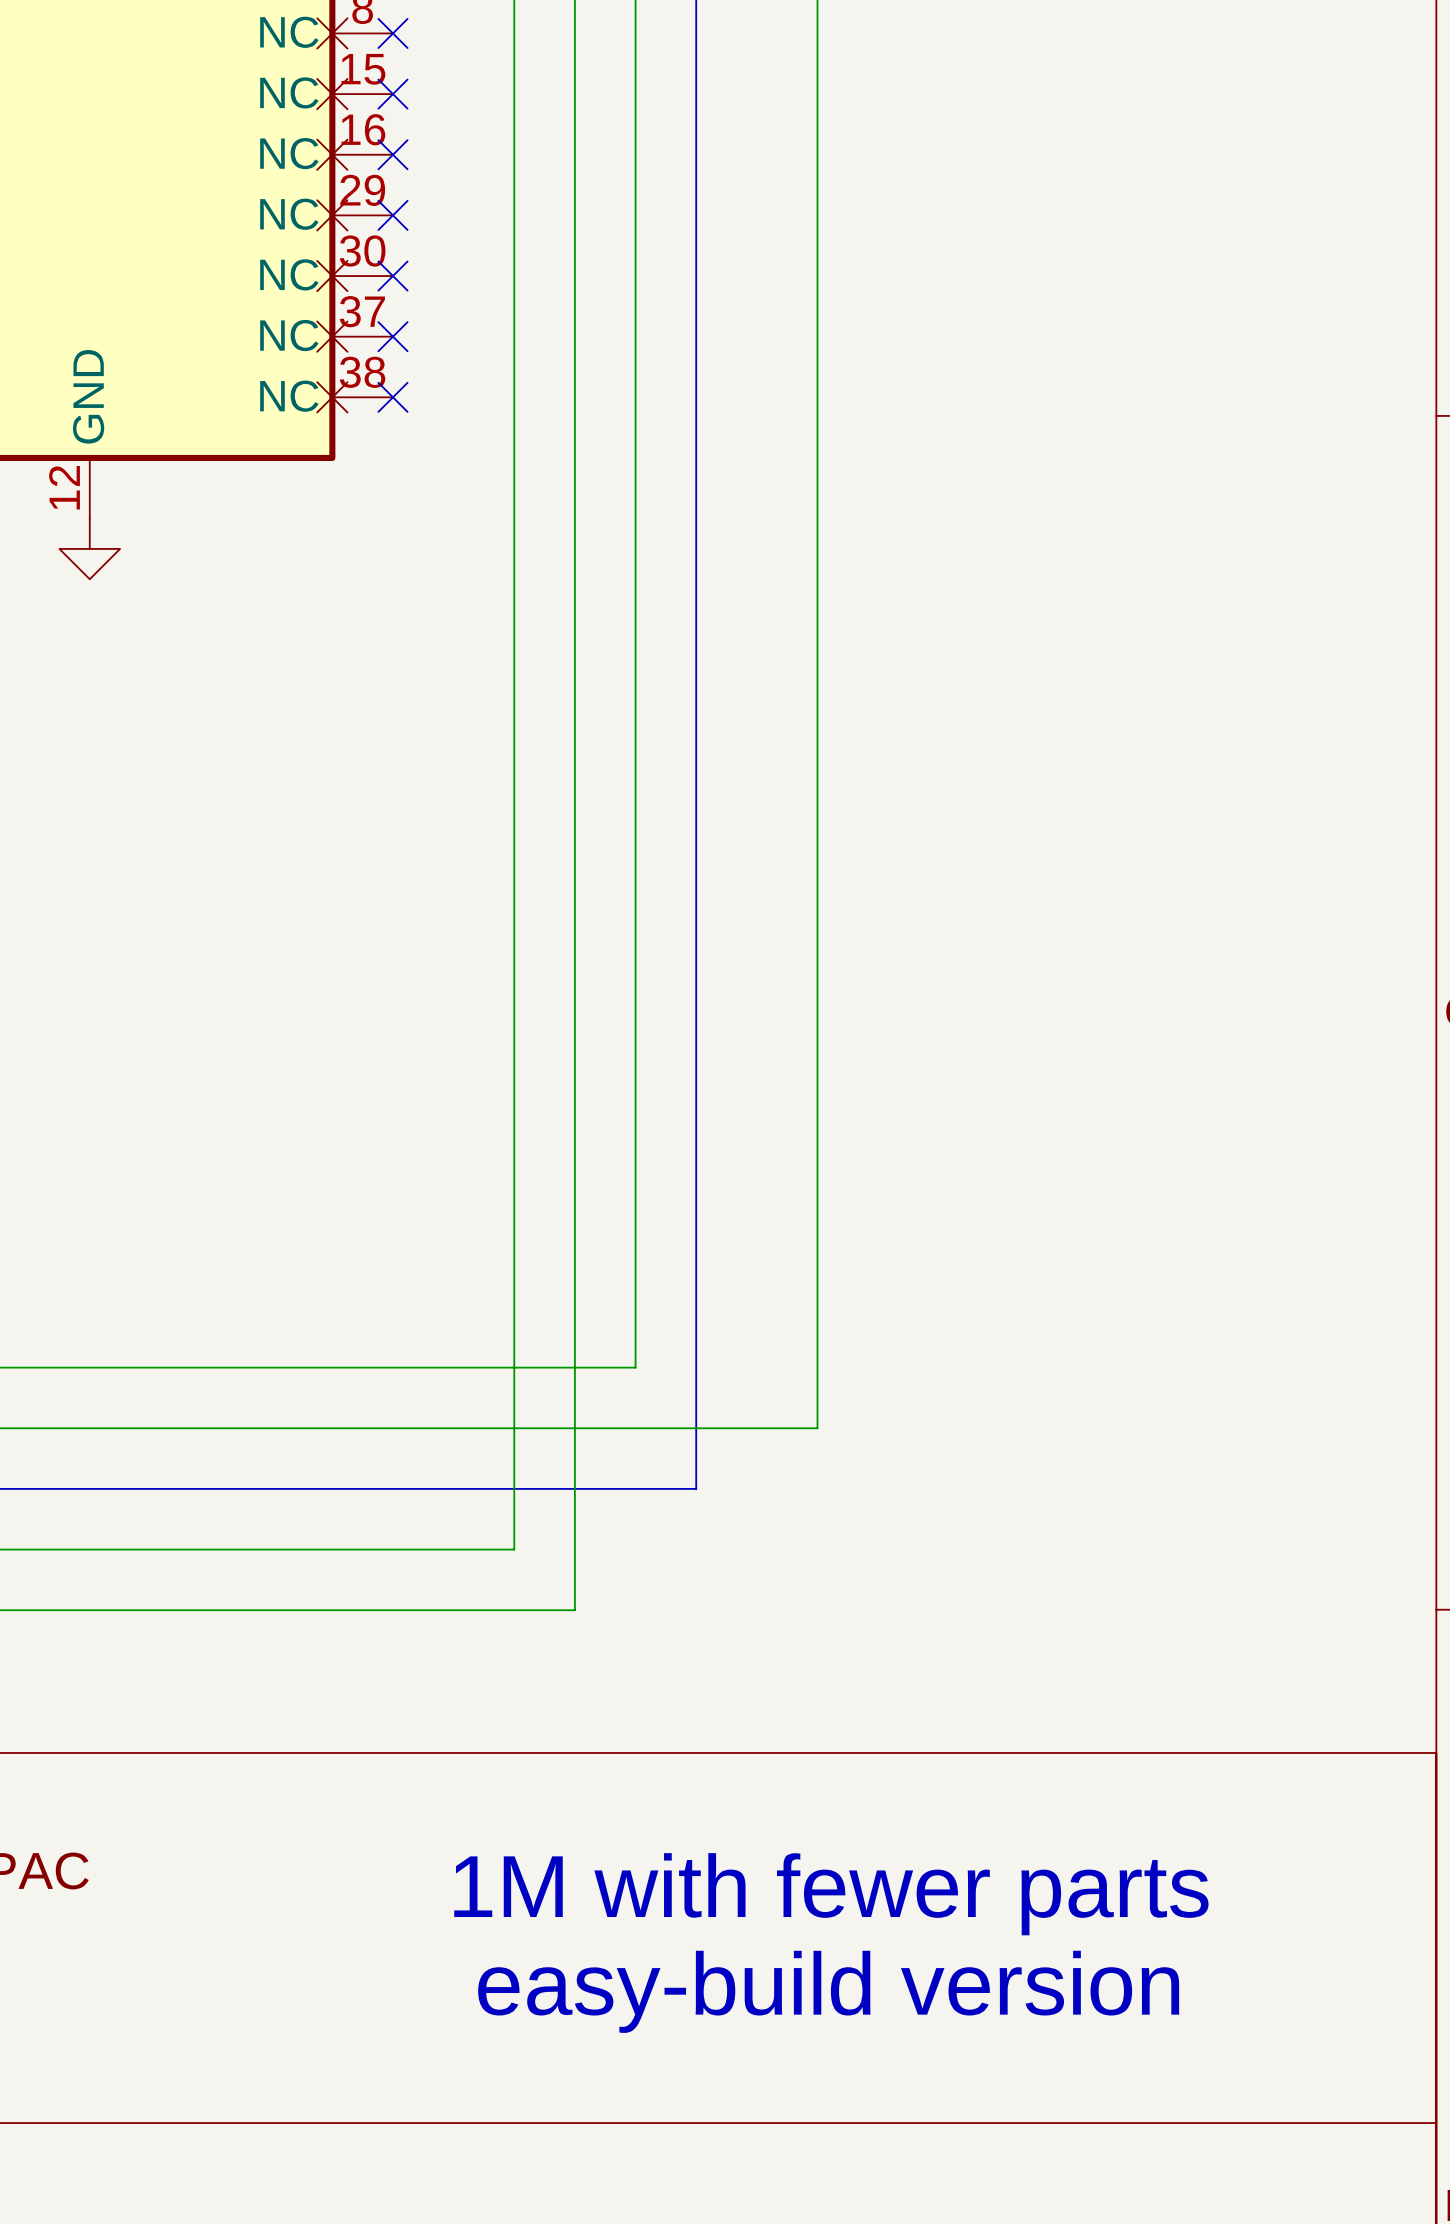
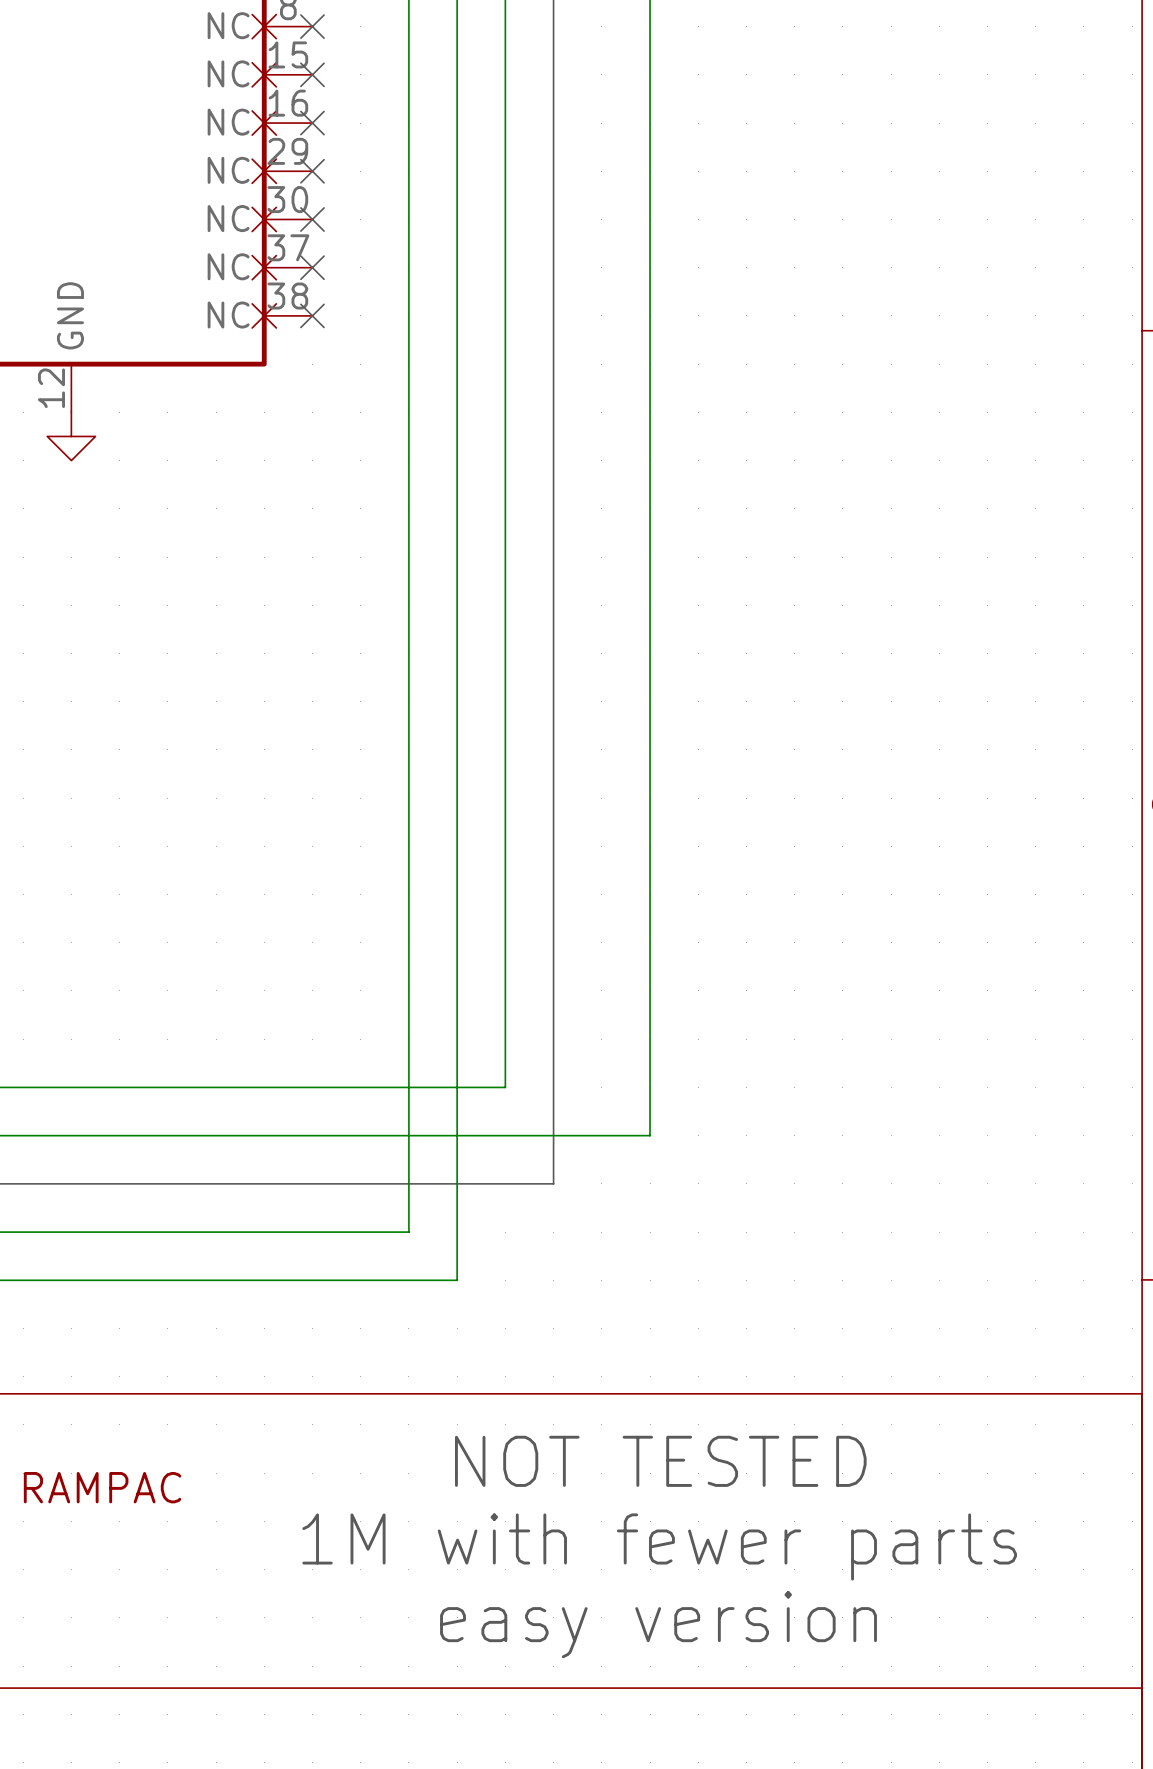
text: none -> NOT TESTED (660, 1461)
text position: 1M with fewer parts (831, 1894) -> 1M with fewer parts (659, 1547)
text: easy-build version (828, 1991) -> easy version (658, 1624)

